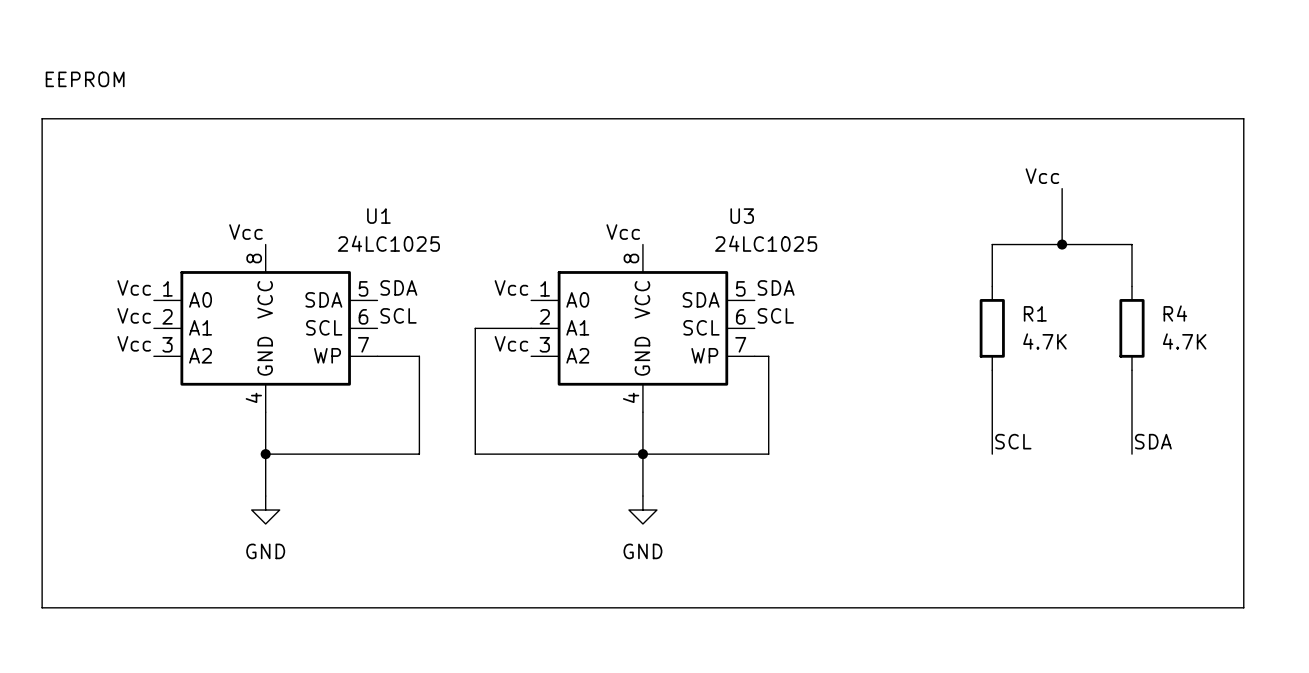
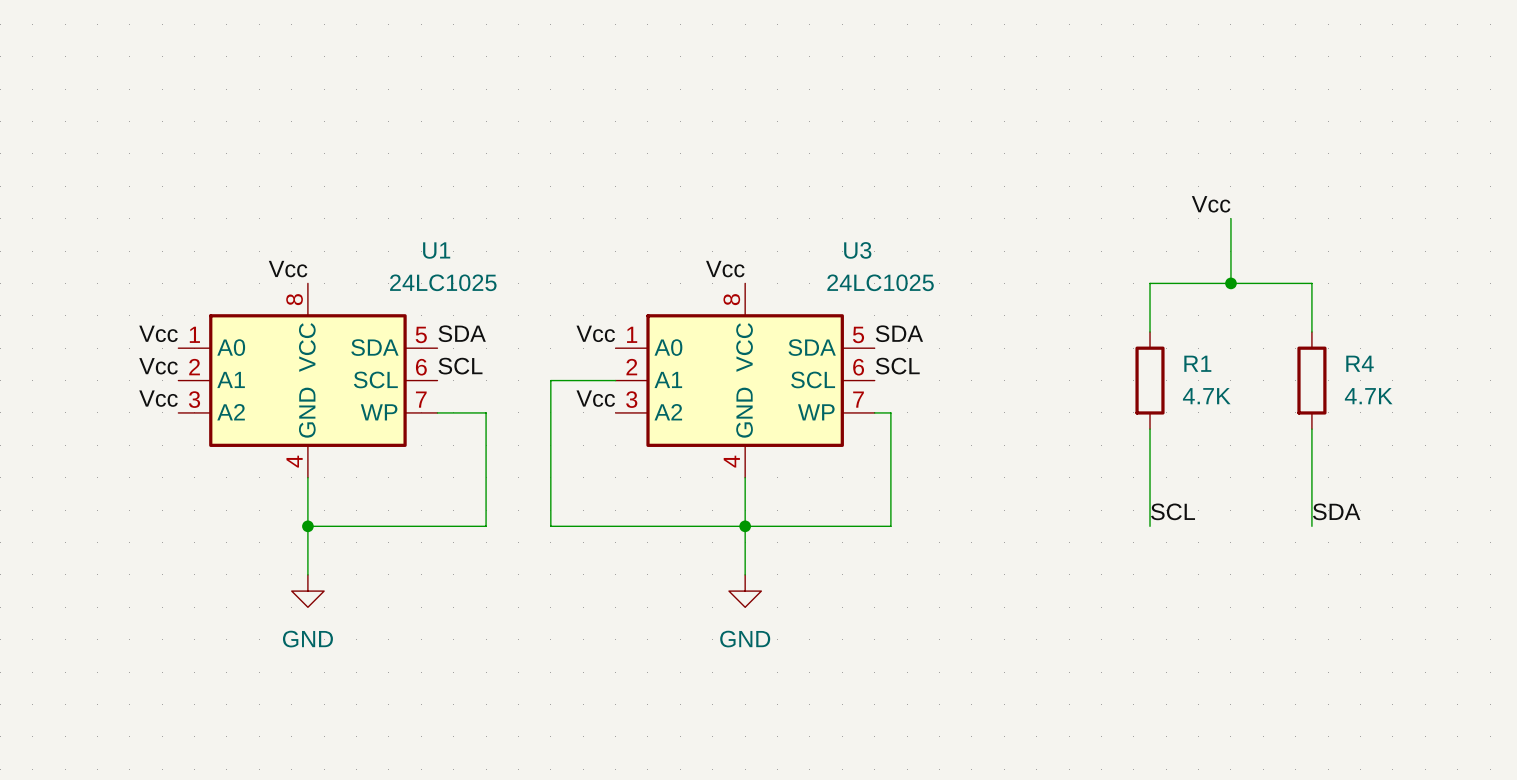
text: EEPROM (85, 79) -> none
line: (42, 118) (42, 607) (1243, 607) (1243, 118) (42, 118) -> none

